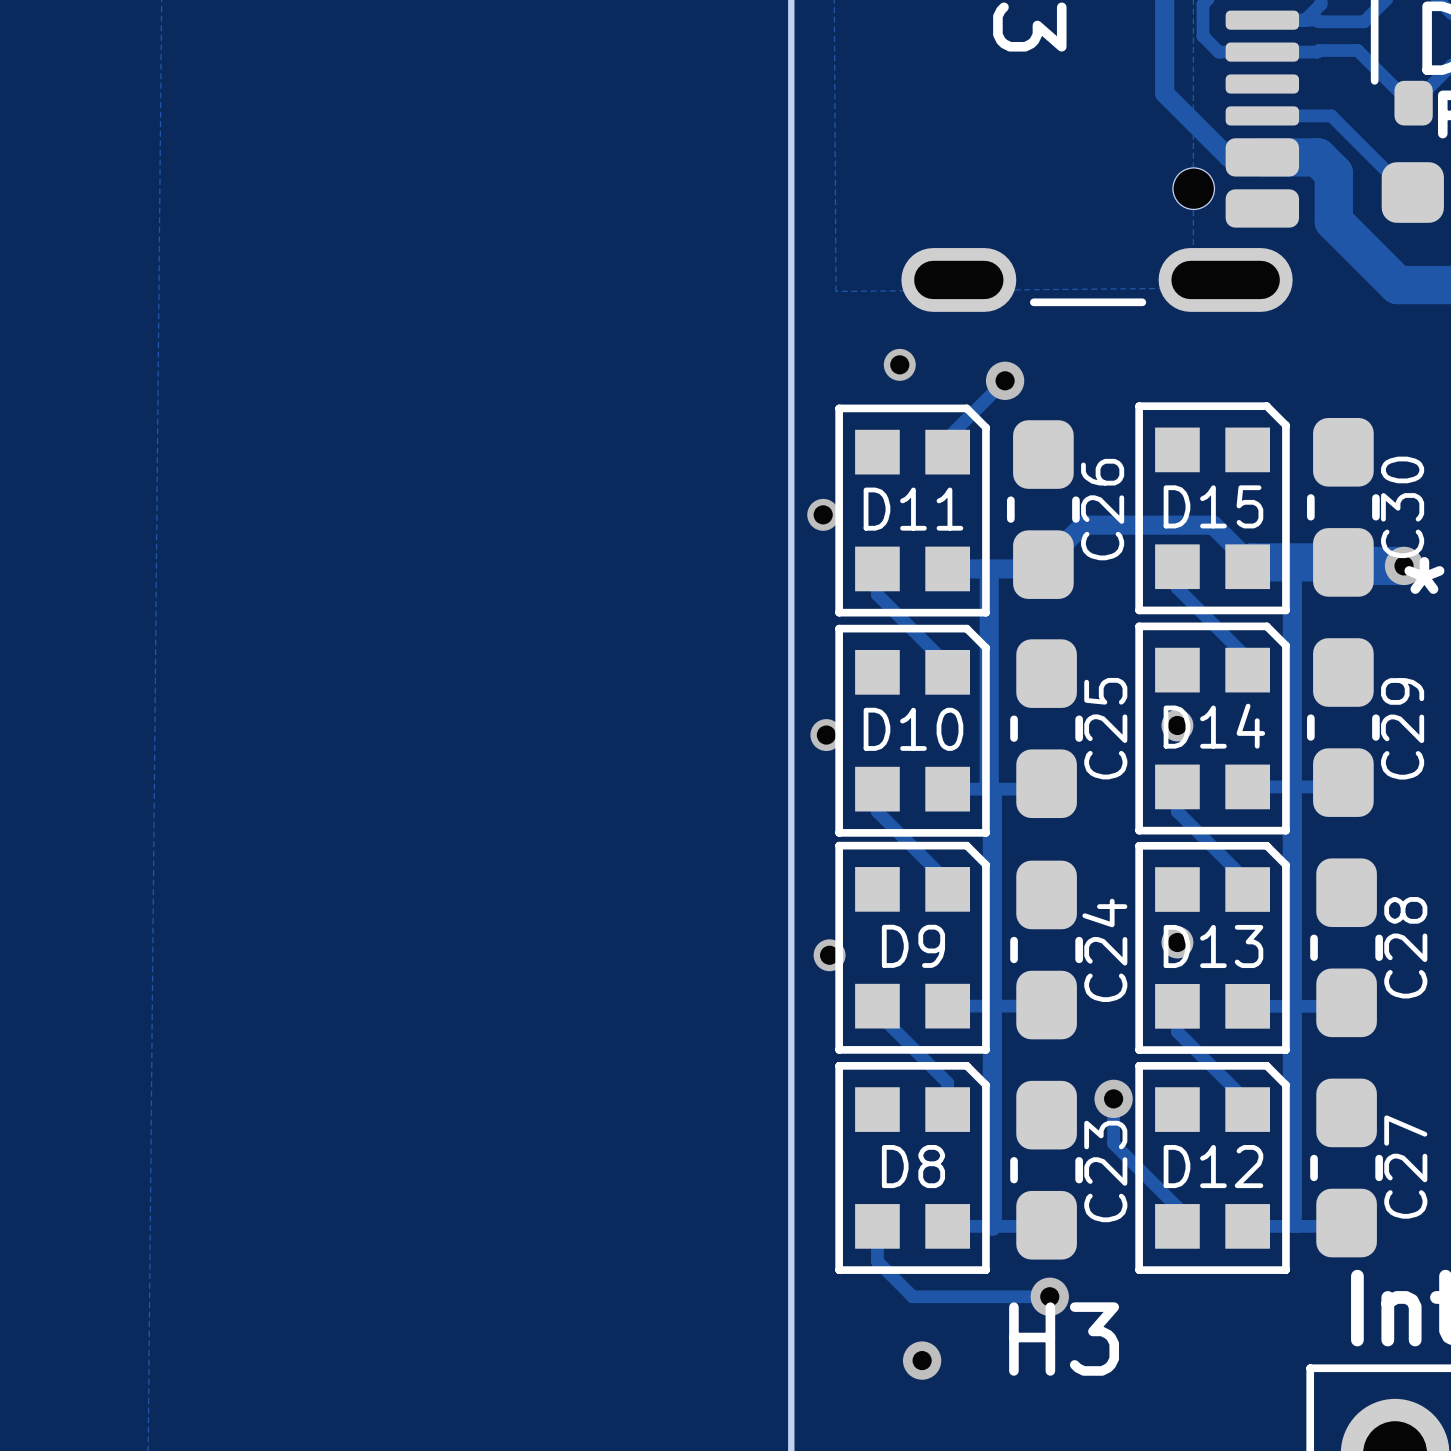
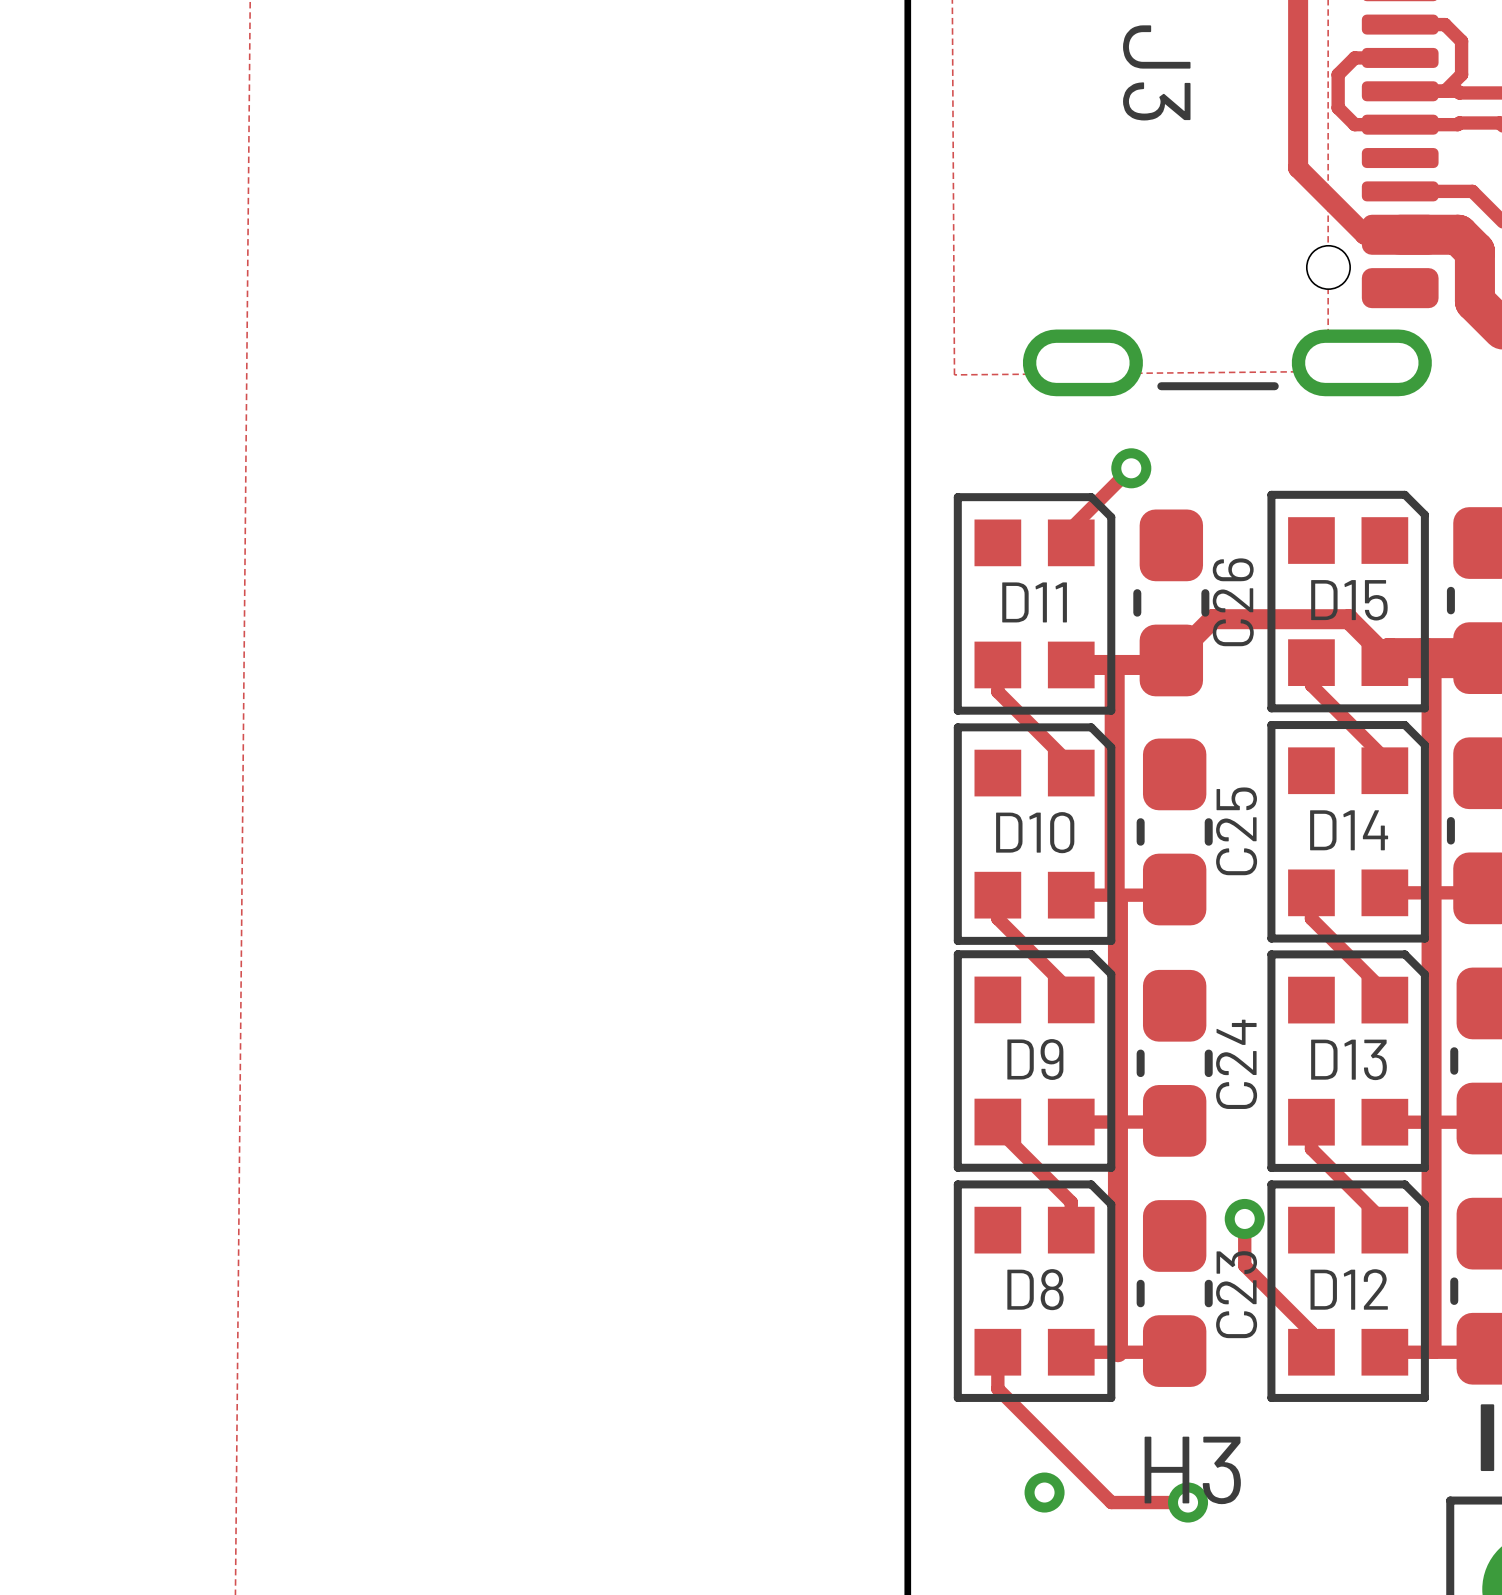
via: (899, 364) -> none
via: (823, 514) -> none
via: (1177, 725) -> none
via: (826, 735) -> none
via: (1177, 942) -> none
via: (829, 955) -> none
track: (912, 1296) (1049, 1296) -> (1034, 1425) (1111, 1502) (1188, 1502)
via position: (1049, 1296) -> (1188, 1502)

